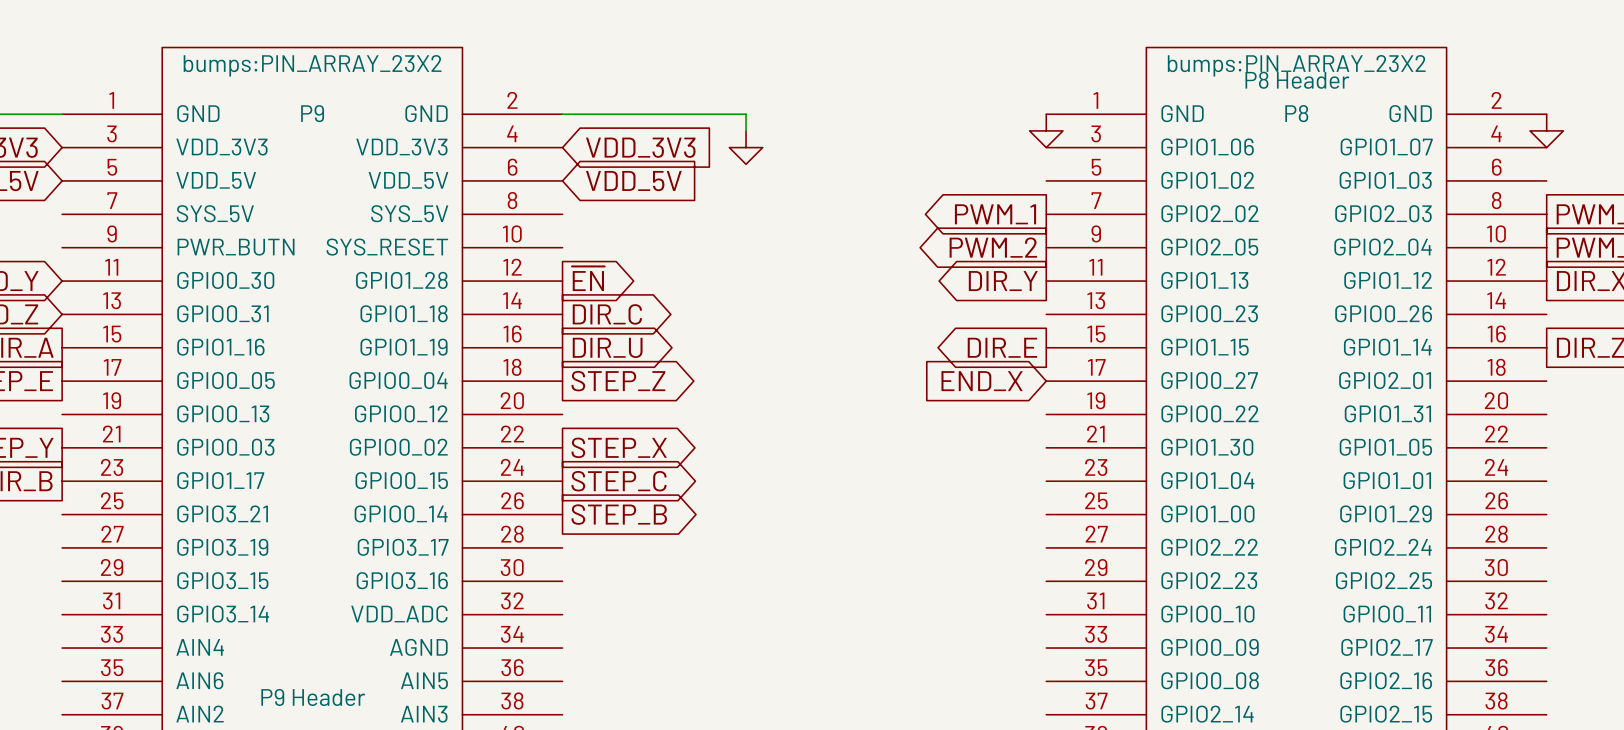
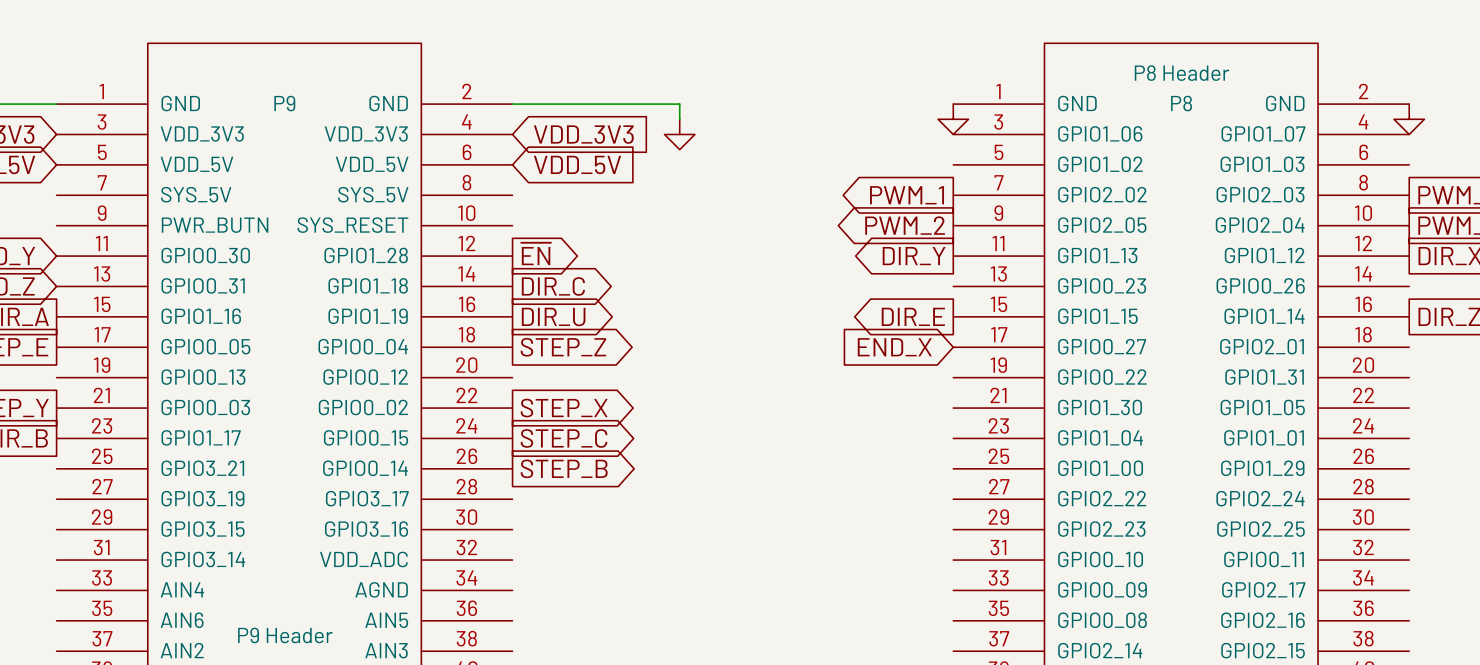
P9 text: bumps:PIN_ARRAY_23X2 (312, 65) -> none
P8 text: bumps:PIN_ARRAY_23X2 (1296, 65) -> none

